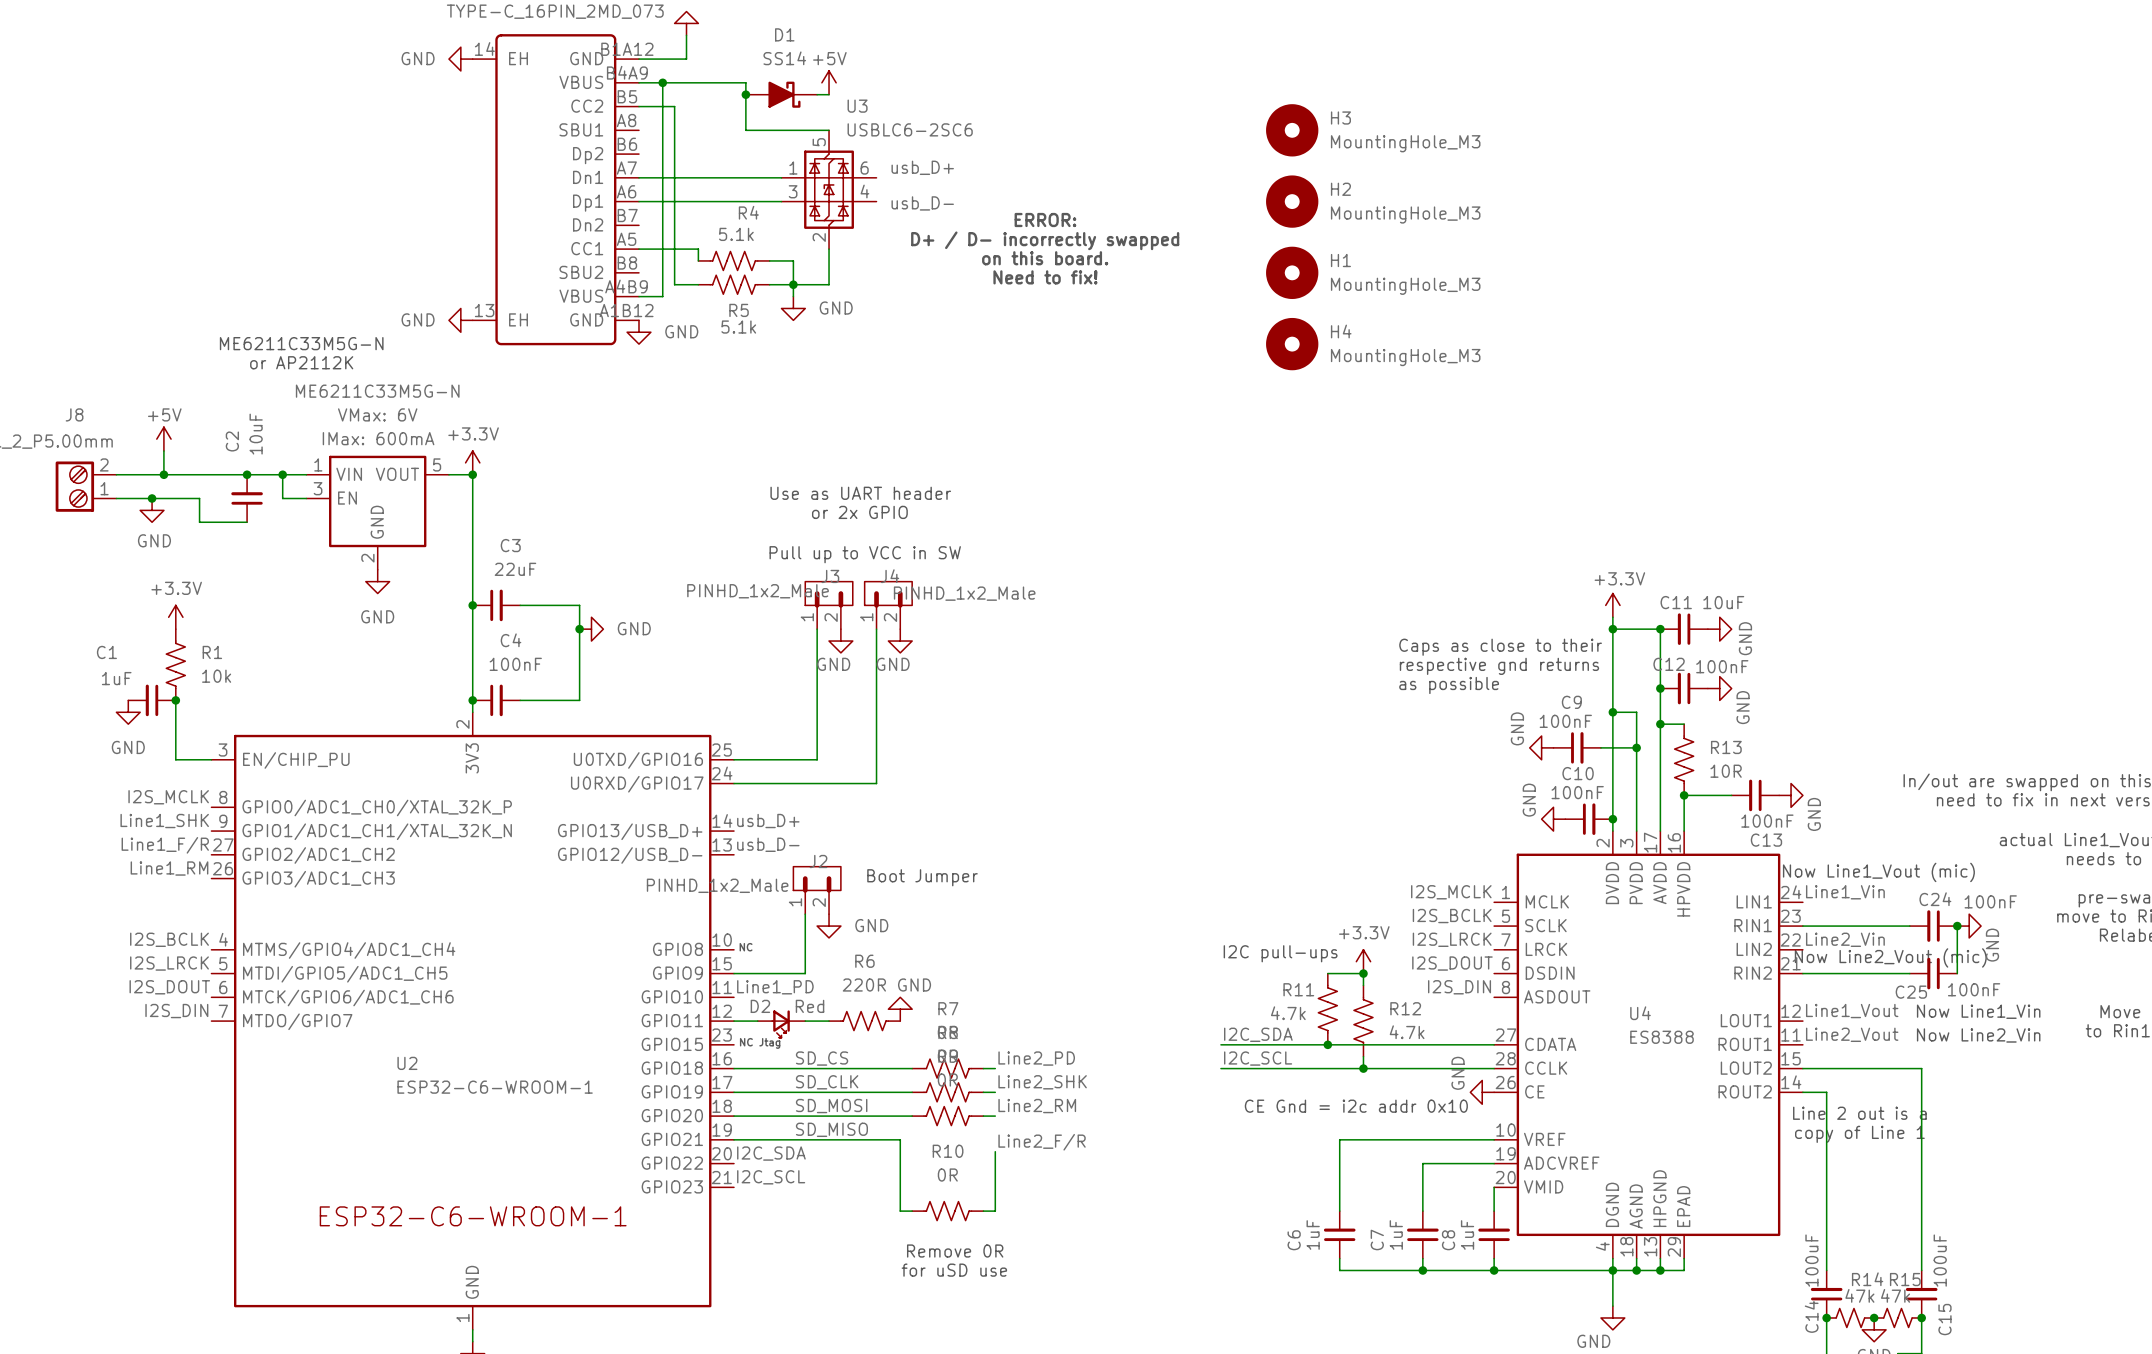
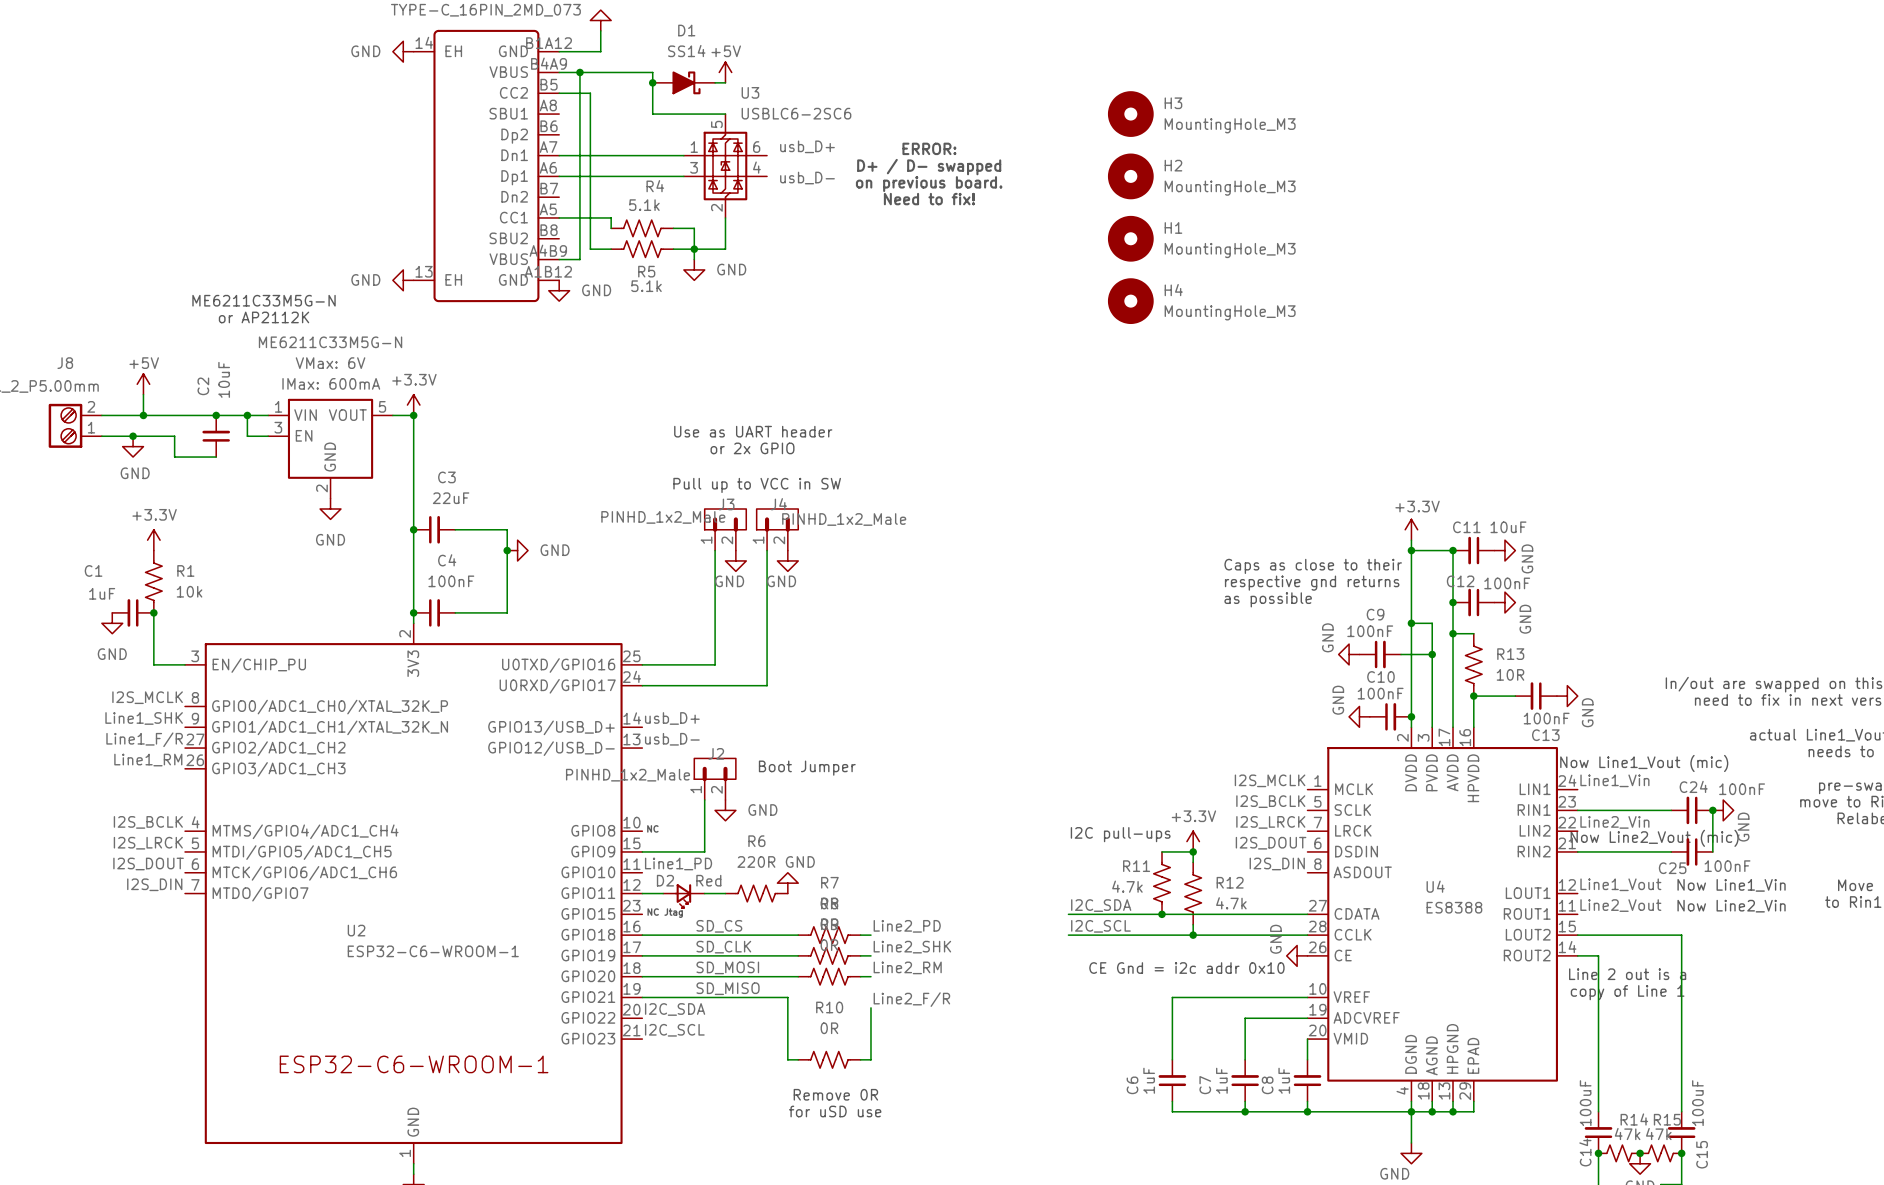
text: none -> D+ / D- swapped (929, 167)
text: none -> on previous board. (929, 184)
text position: ERROR: (1045, 220) -> ERROR: (929, 148)
text: D+ / D- incorrectly swapped (1045, 240) -> none
text: on this board. (1045, 258) -> none
text position: Need to fix! (1045, 277) -> Need to fix! (929, 199)

